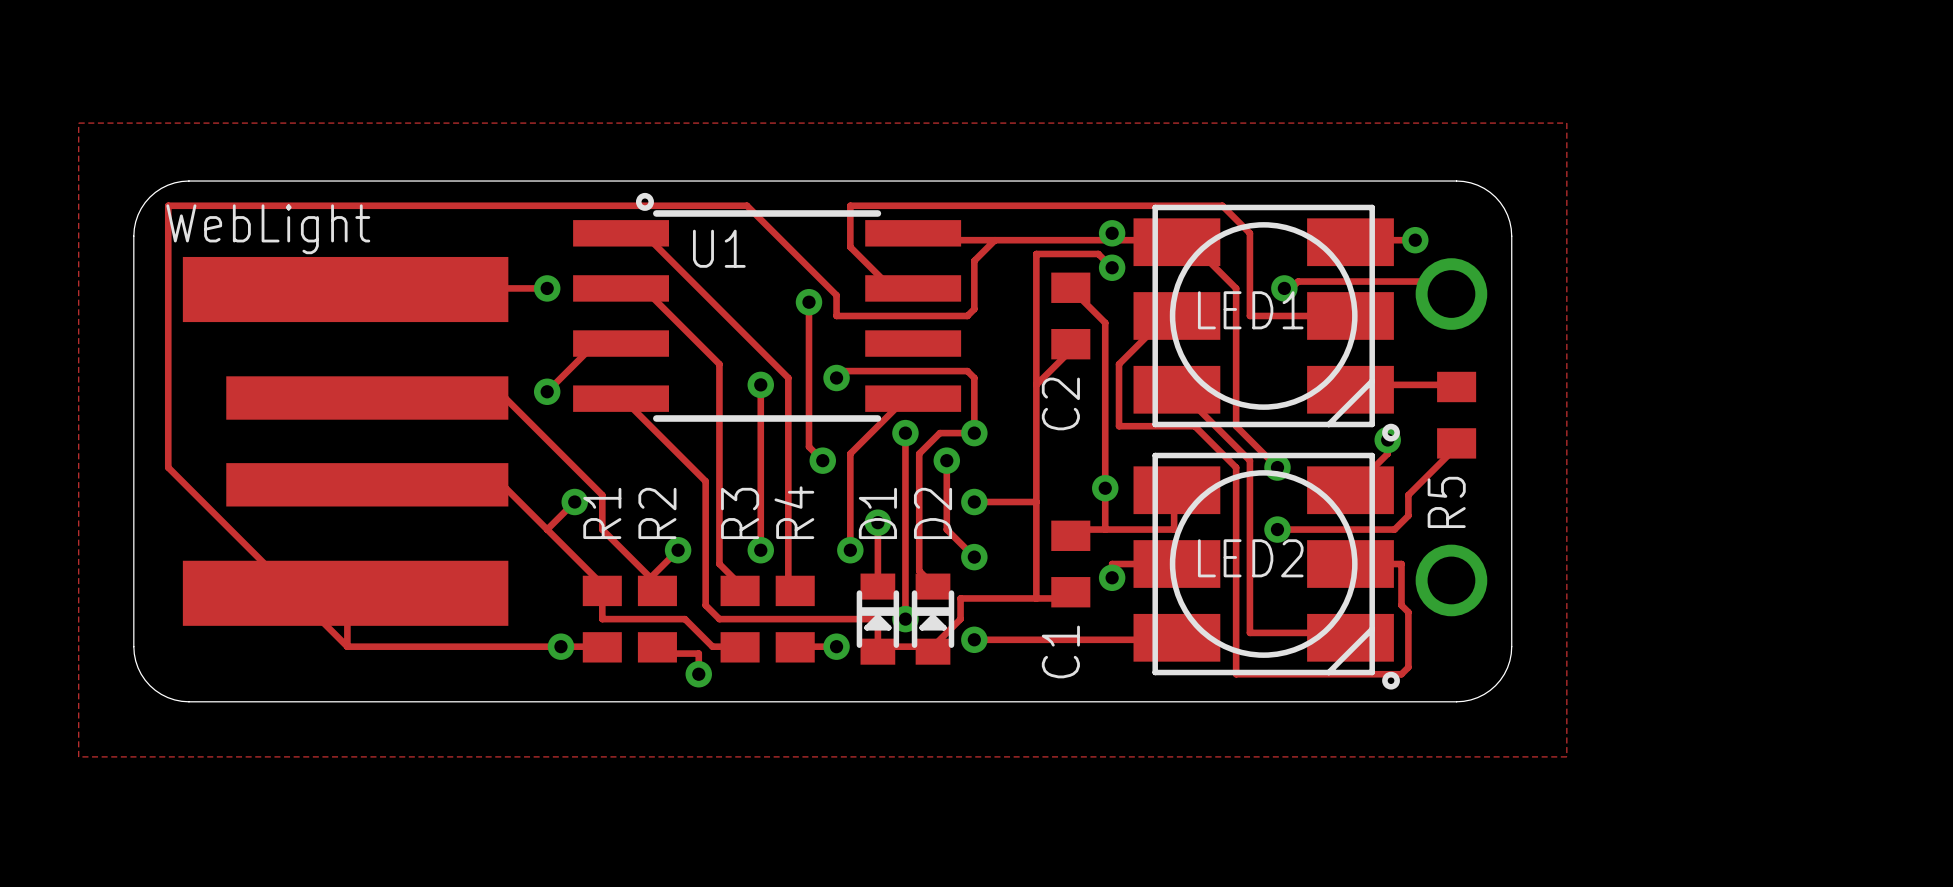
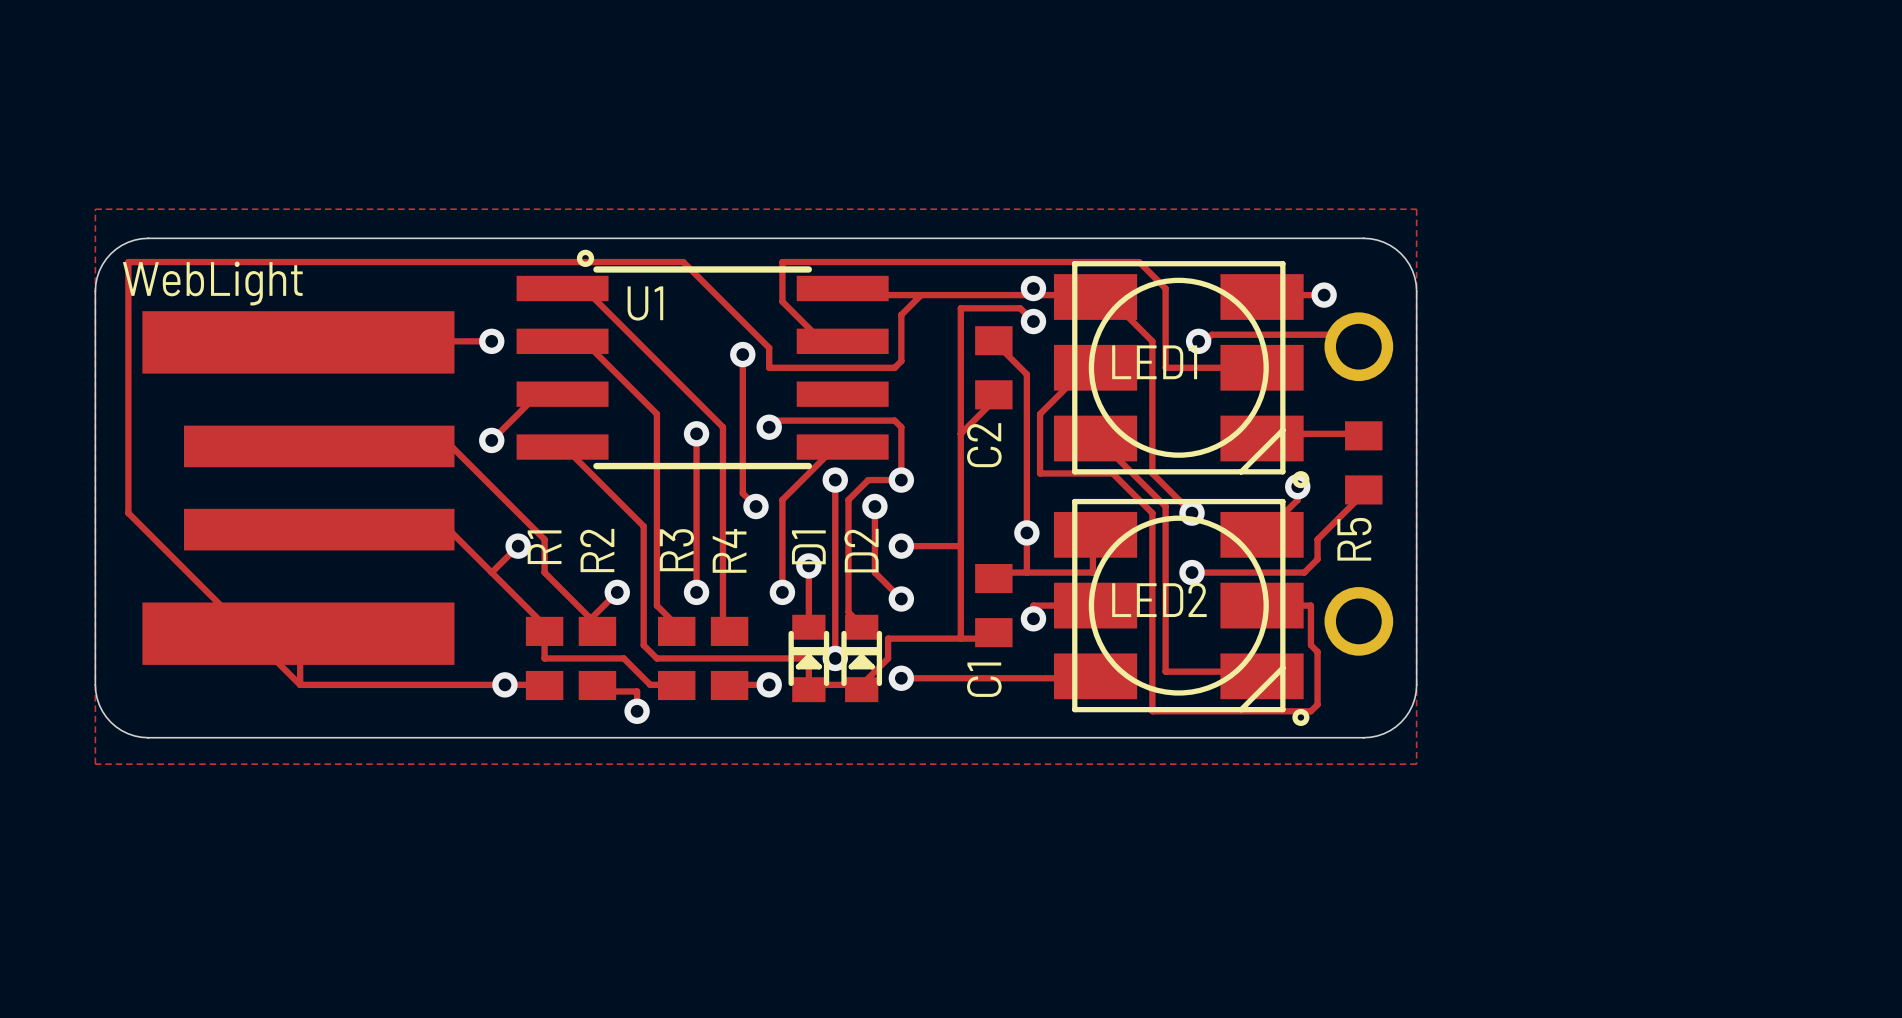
zone outline: (78, 123) (1566, 123) (1566, 756) (78, 756) (78, 123) -> (95, 209) (95, 764) (1416, 764) (1416, 209) (95, 209)

